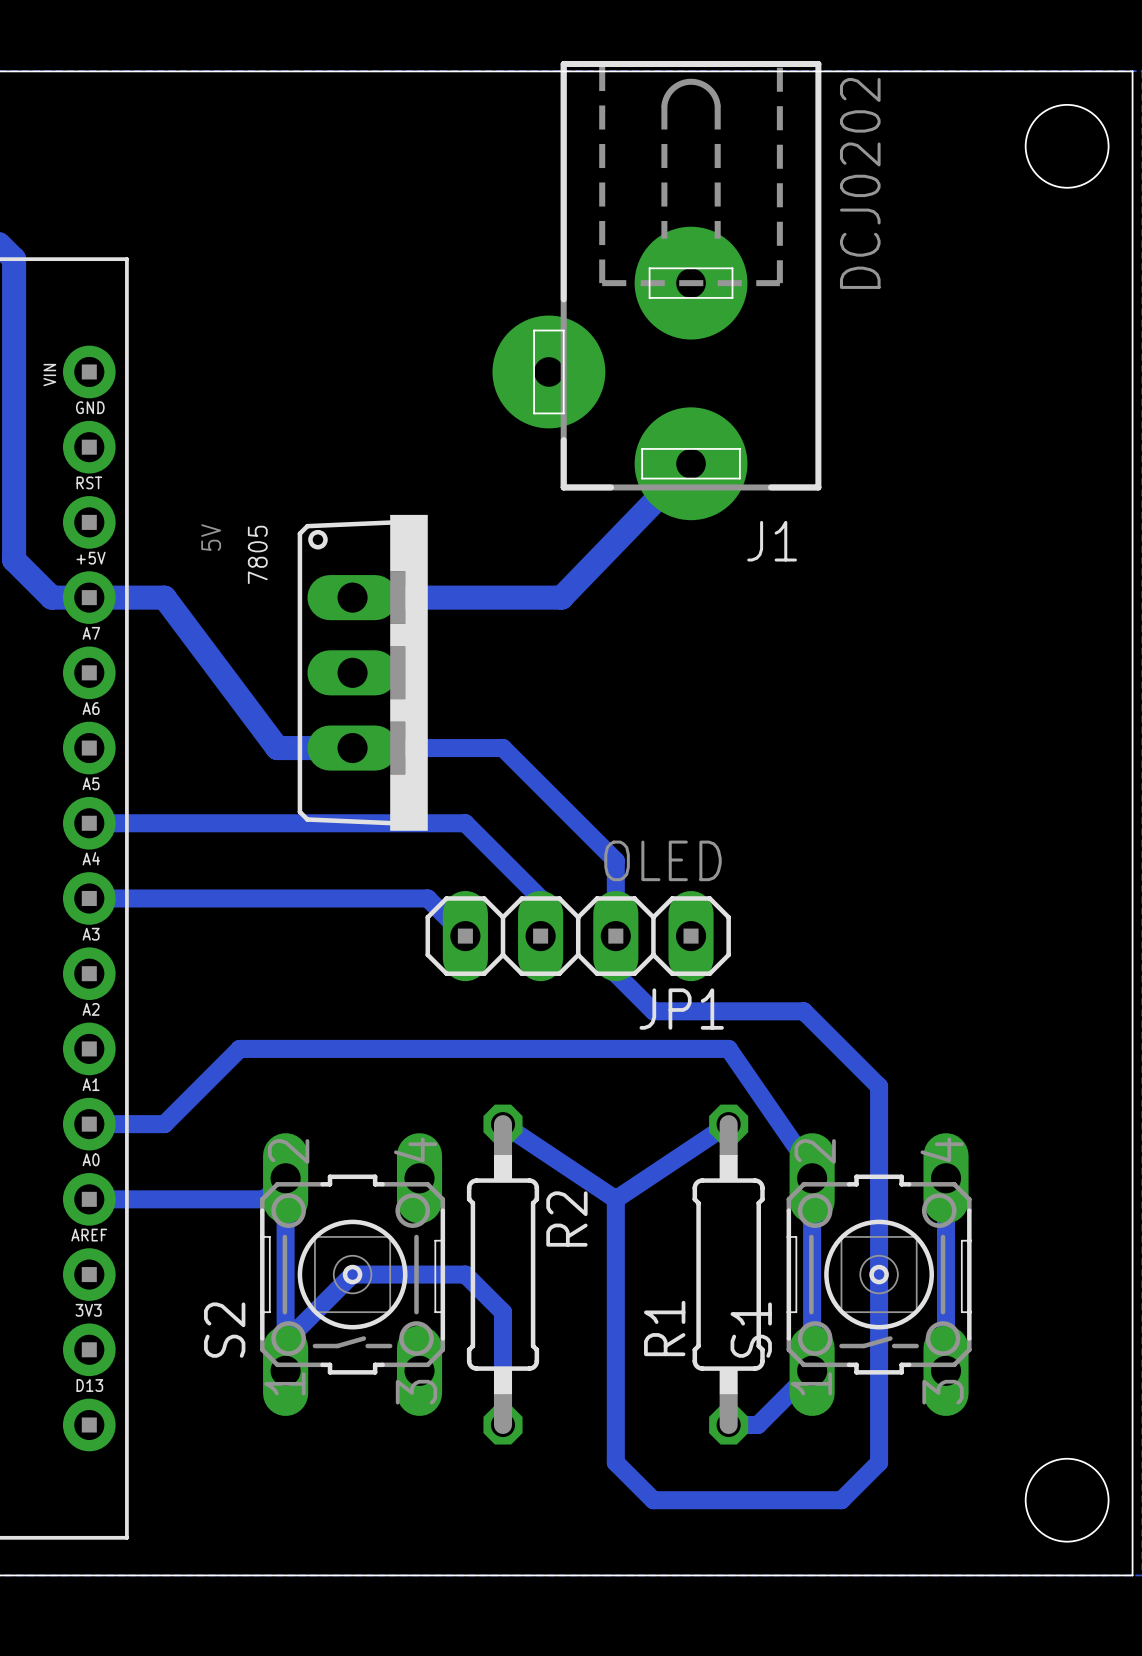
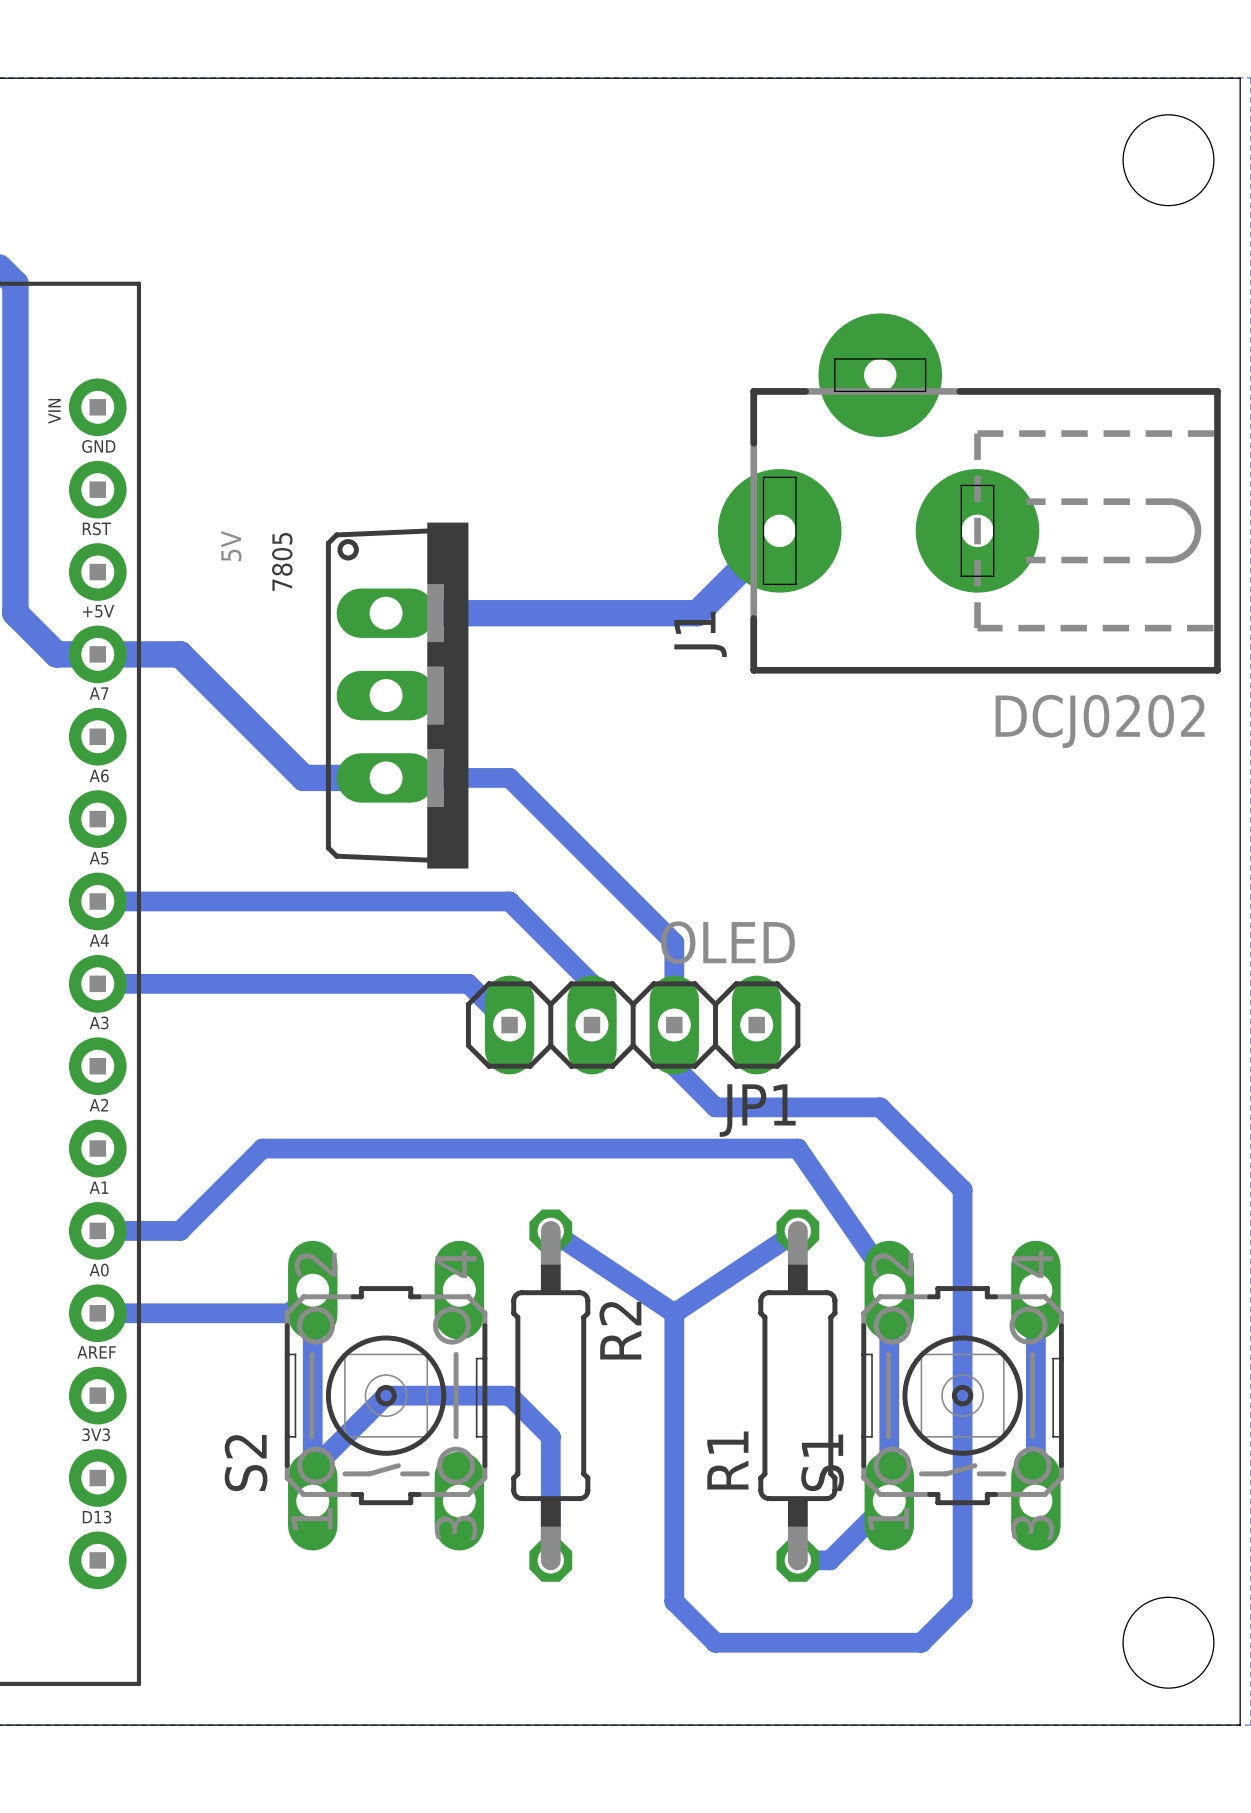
J1 rotation: 0° (656, 290) -> 90° clockwise (969, 493)
J1 position: (656, 290) -> (969, 493)
bottom track: (691, 463) (561, 597) (352, 597) -> none
bottom track: none -> (779, 530) (697, 613) (386, 613)
bottom track: (164, 597) (277, 748) (503, 748) -> (180, 654) (303, 777) (509, 777) (550, 819)
part position: (362, 672) -> (397, 695)

